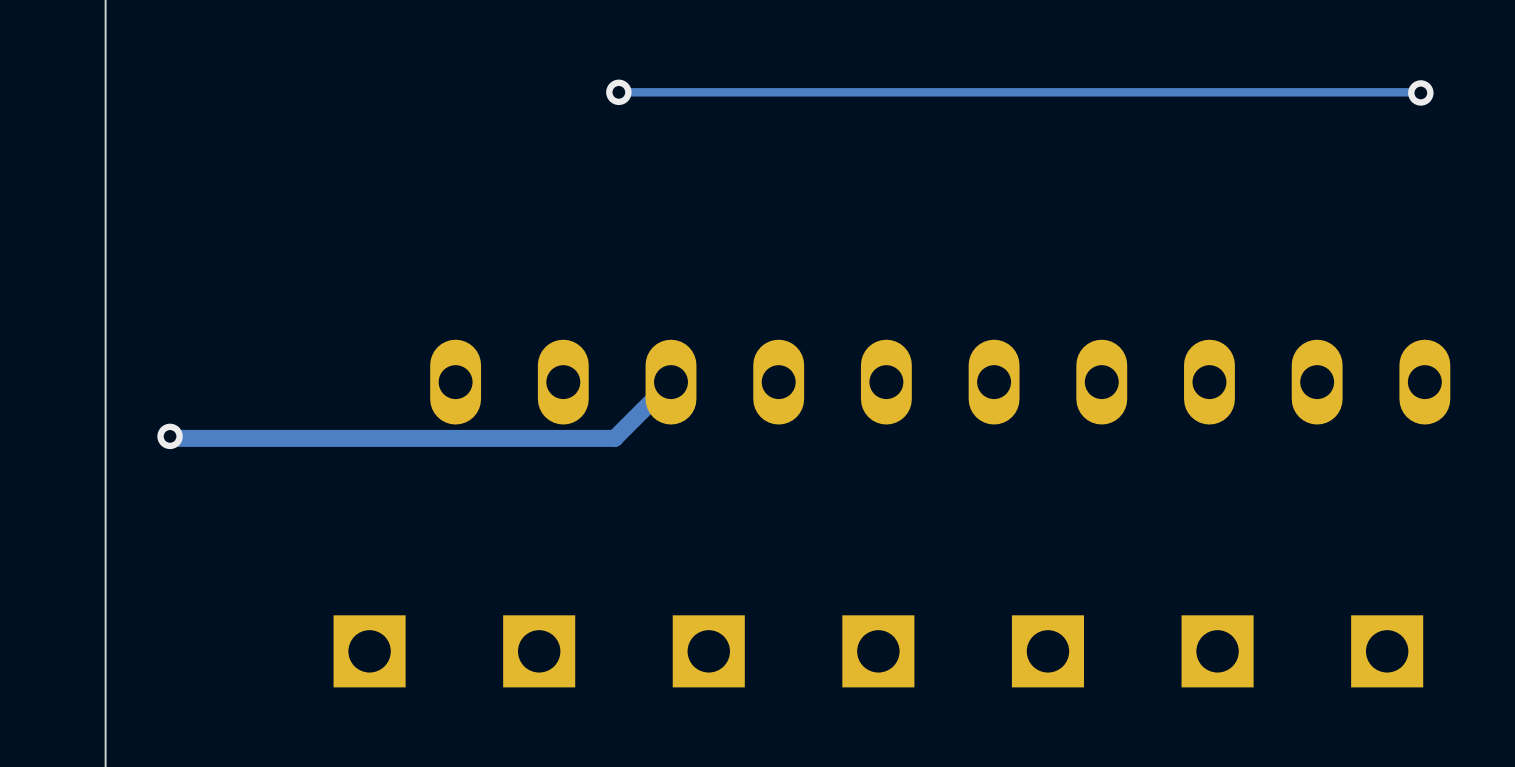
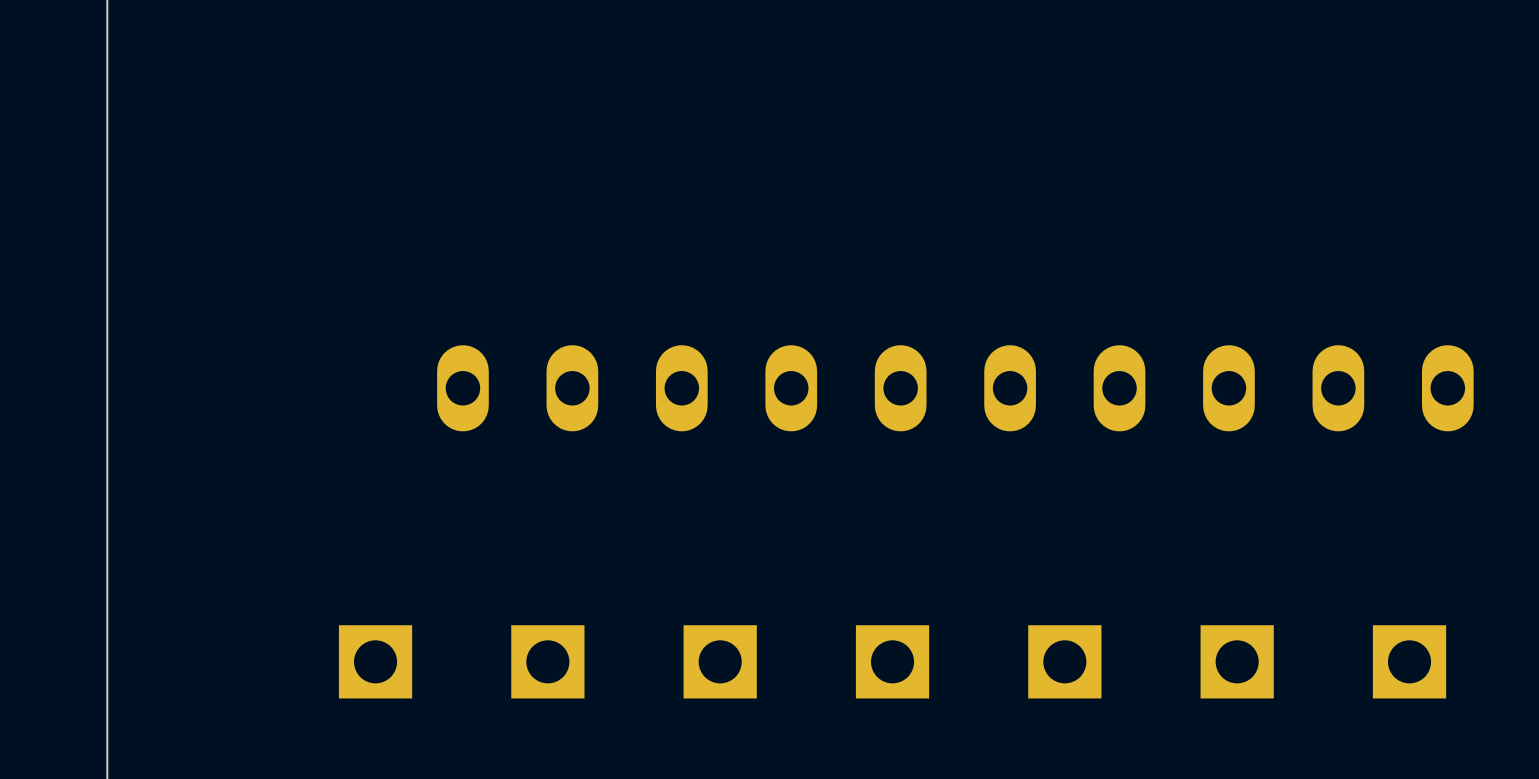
track: (618, 92) (1420, 92) -> none
via: (618, 92) -> none
via: (1420, 92) -> none
track: (671, 382) (614, 438) (172, 438) (170, 436) -> none
via: (170, 436) -> none

